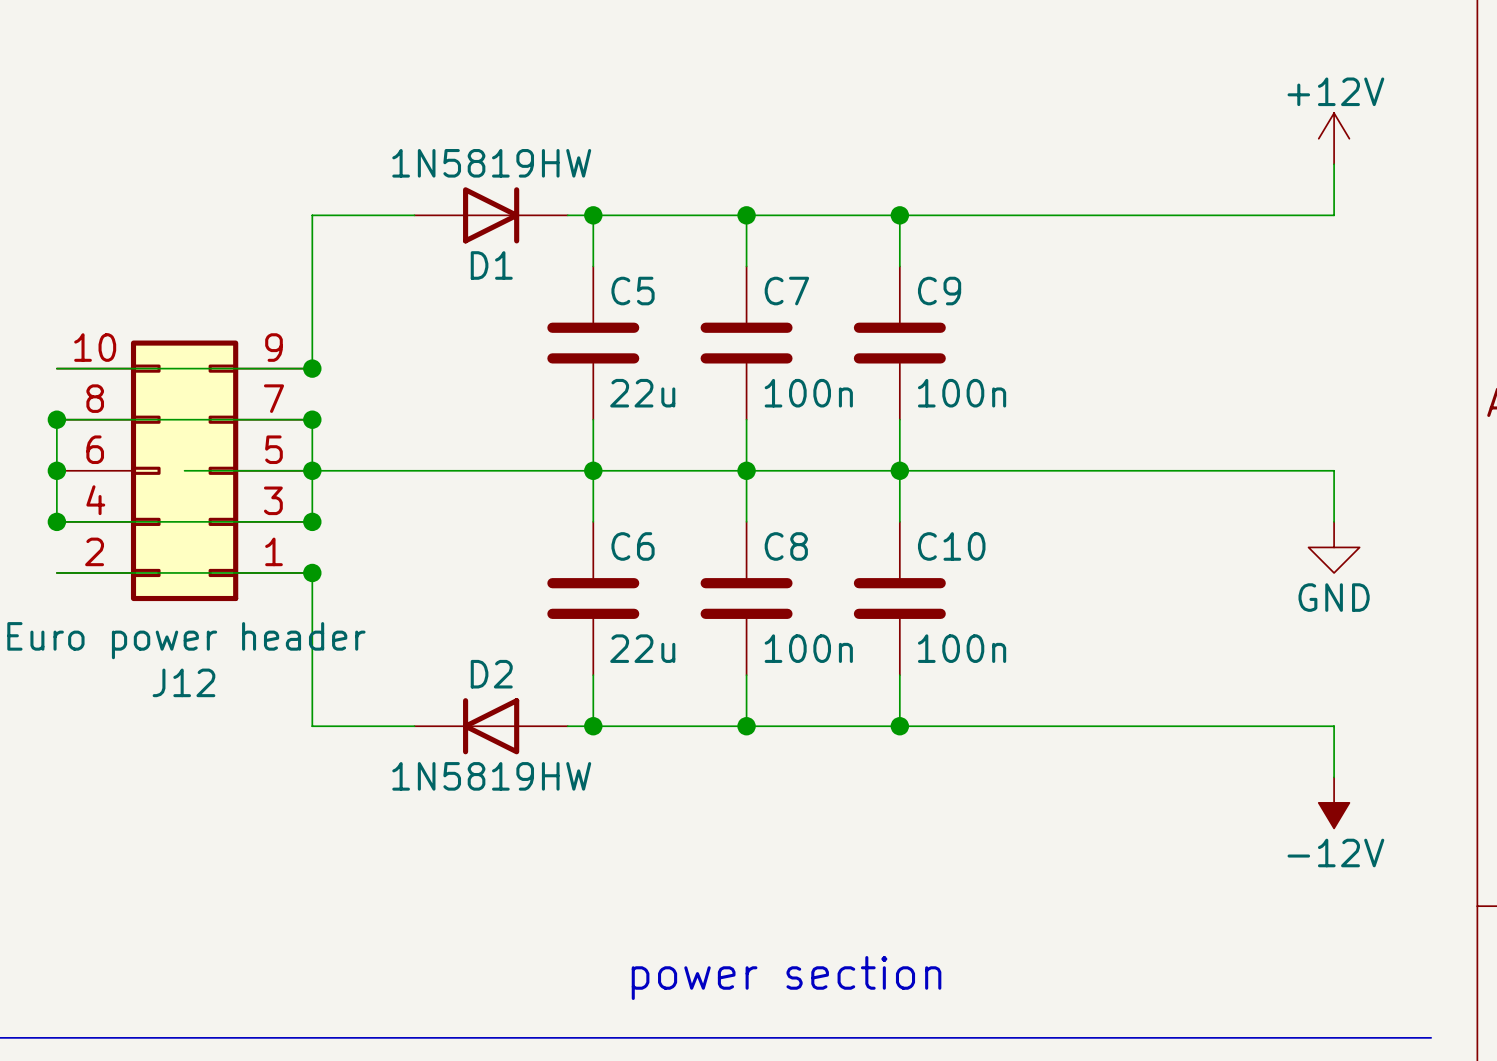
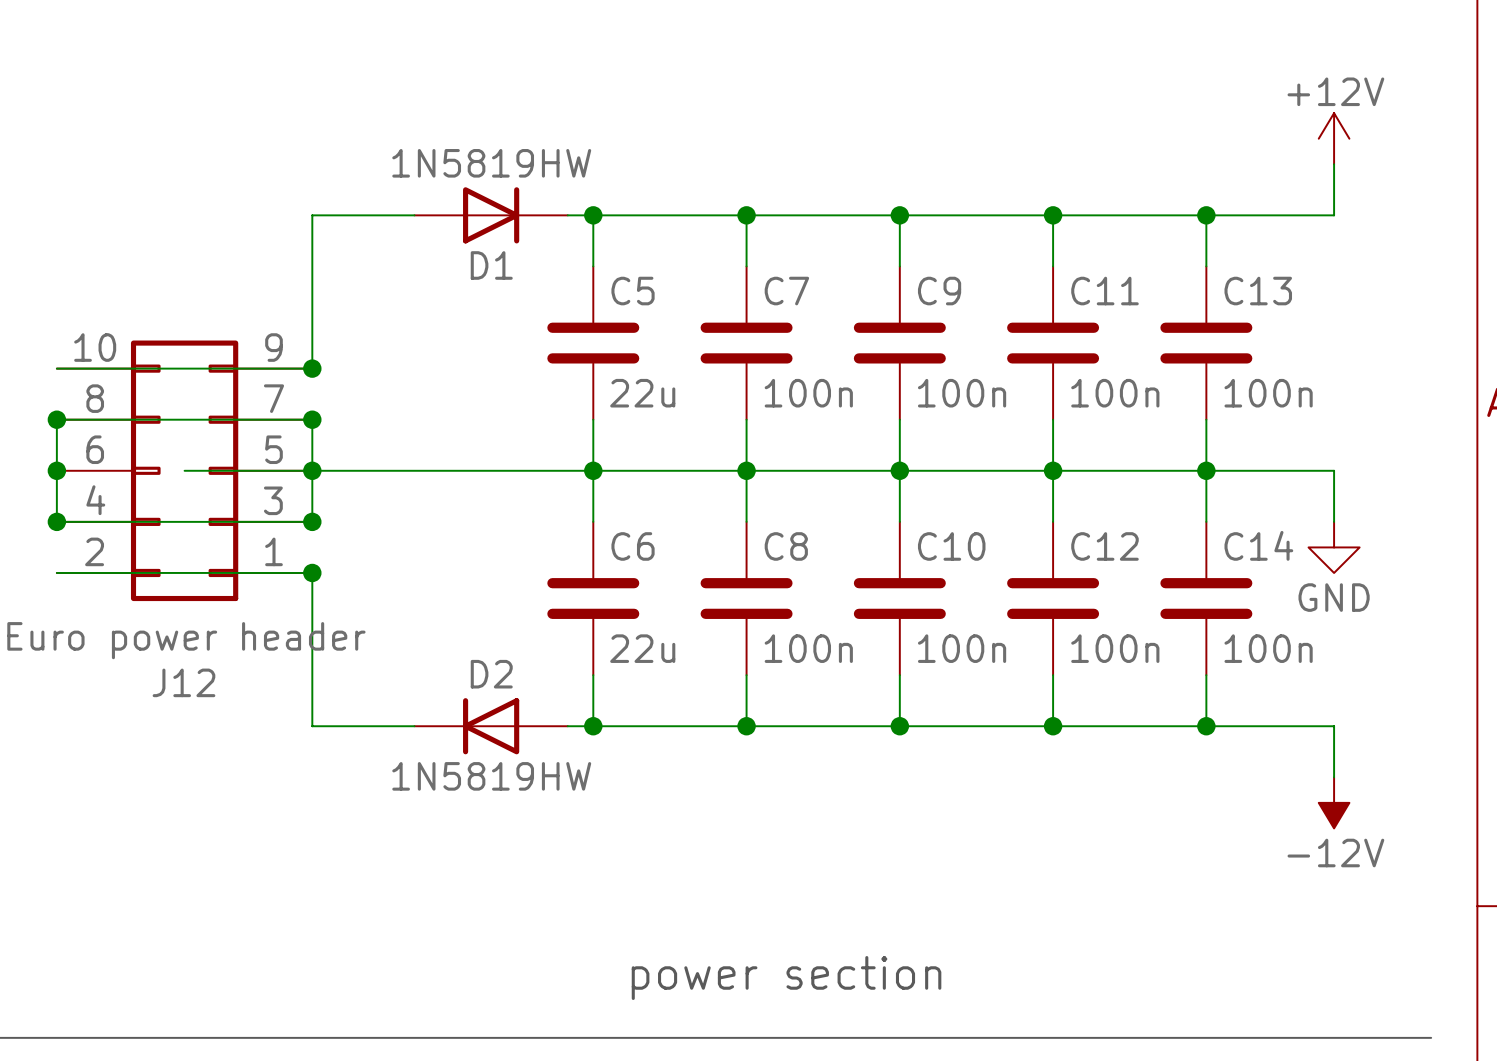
wire: none -> (1053, 215) (1053, 266)
junction: none -> (1053, 215)
wire: none -> (1206, 215) (1206, 266)
junction: none -> (1206, 215)
C11: none -> 100n (1053, 343)
C13: none -> 100n (1206, 343)
wire: none -> (1053, 419) (1053, 521)
wire: none -> (1206, 419) (1206, 521)
junction: none -> (1053, 470)
junction: none -> (1206, 470)
C12: none -> 100n (1053, 598)
C14: none -> 100n (1206, 598)
wire: none -> (1053, 675) (1053, 726)
wire: none -> (1206, 675) (1206, 726)
junction: none -> (1053, 726)
junction: none -> (1206, 726)

